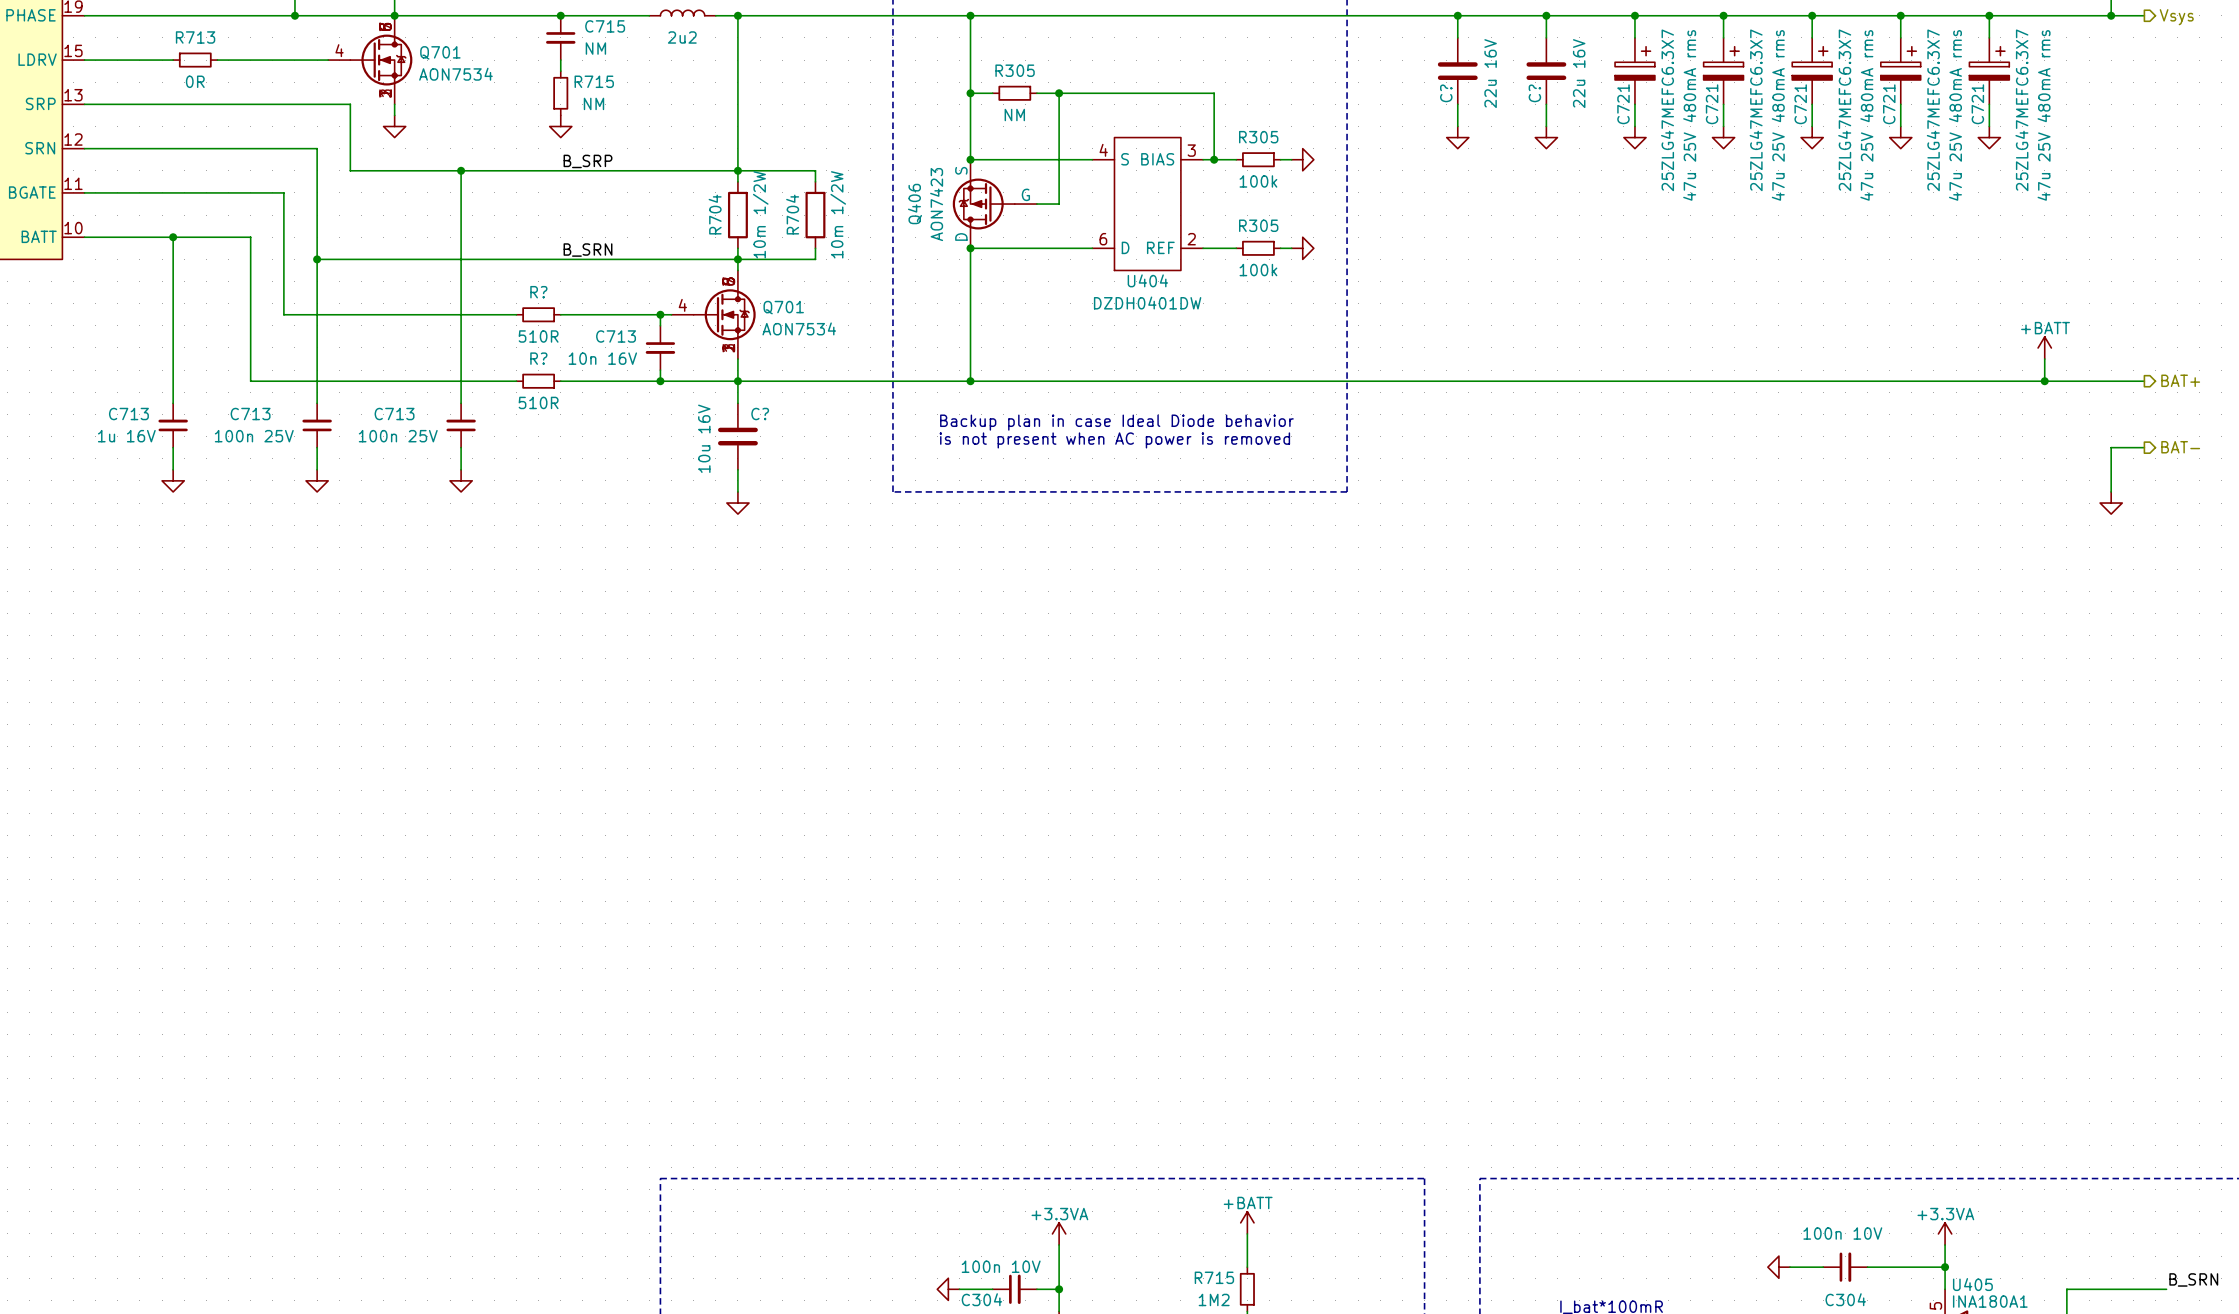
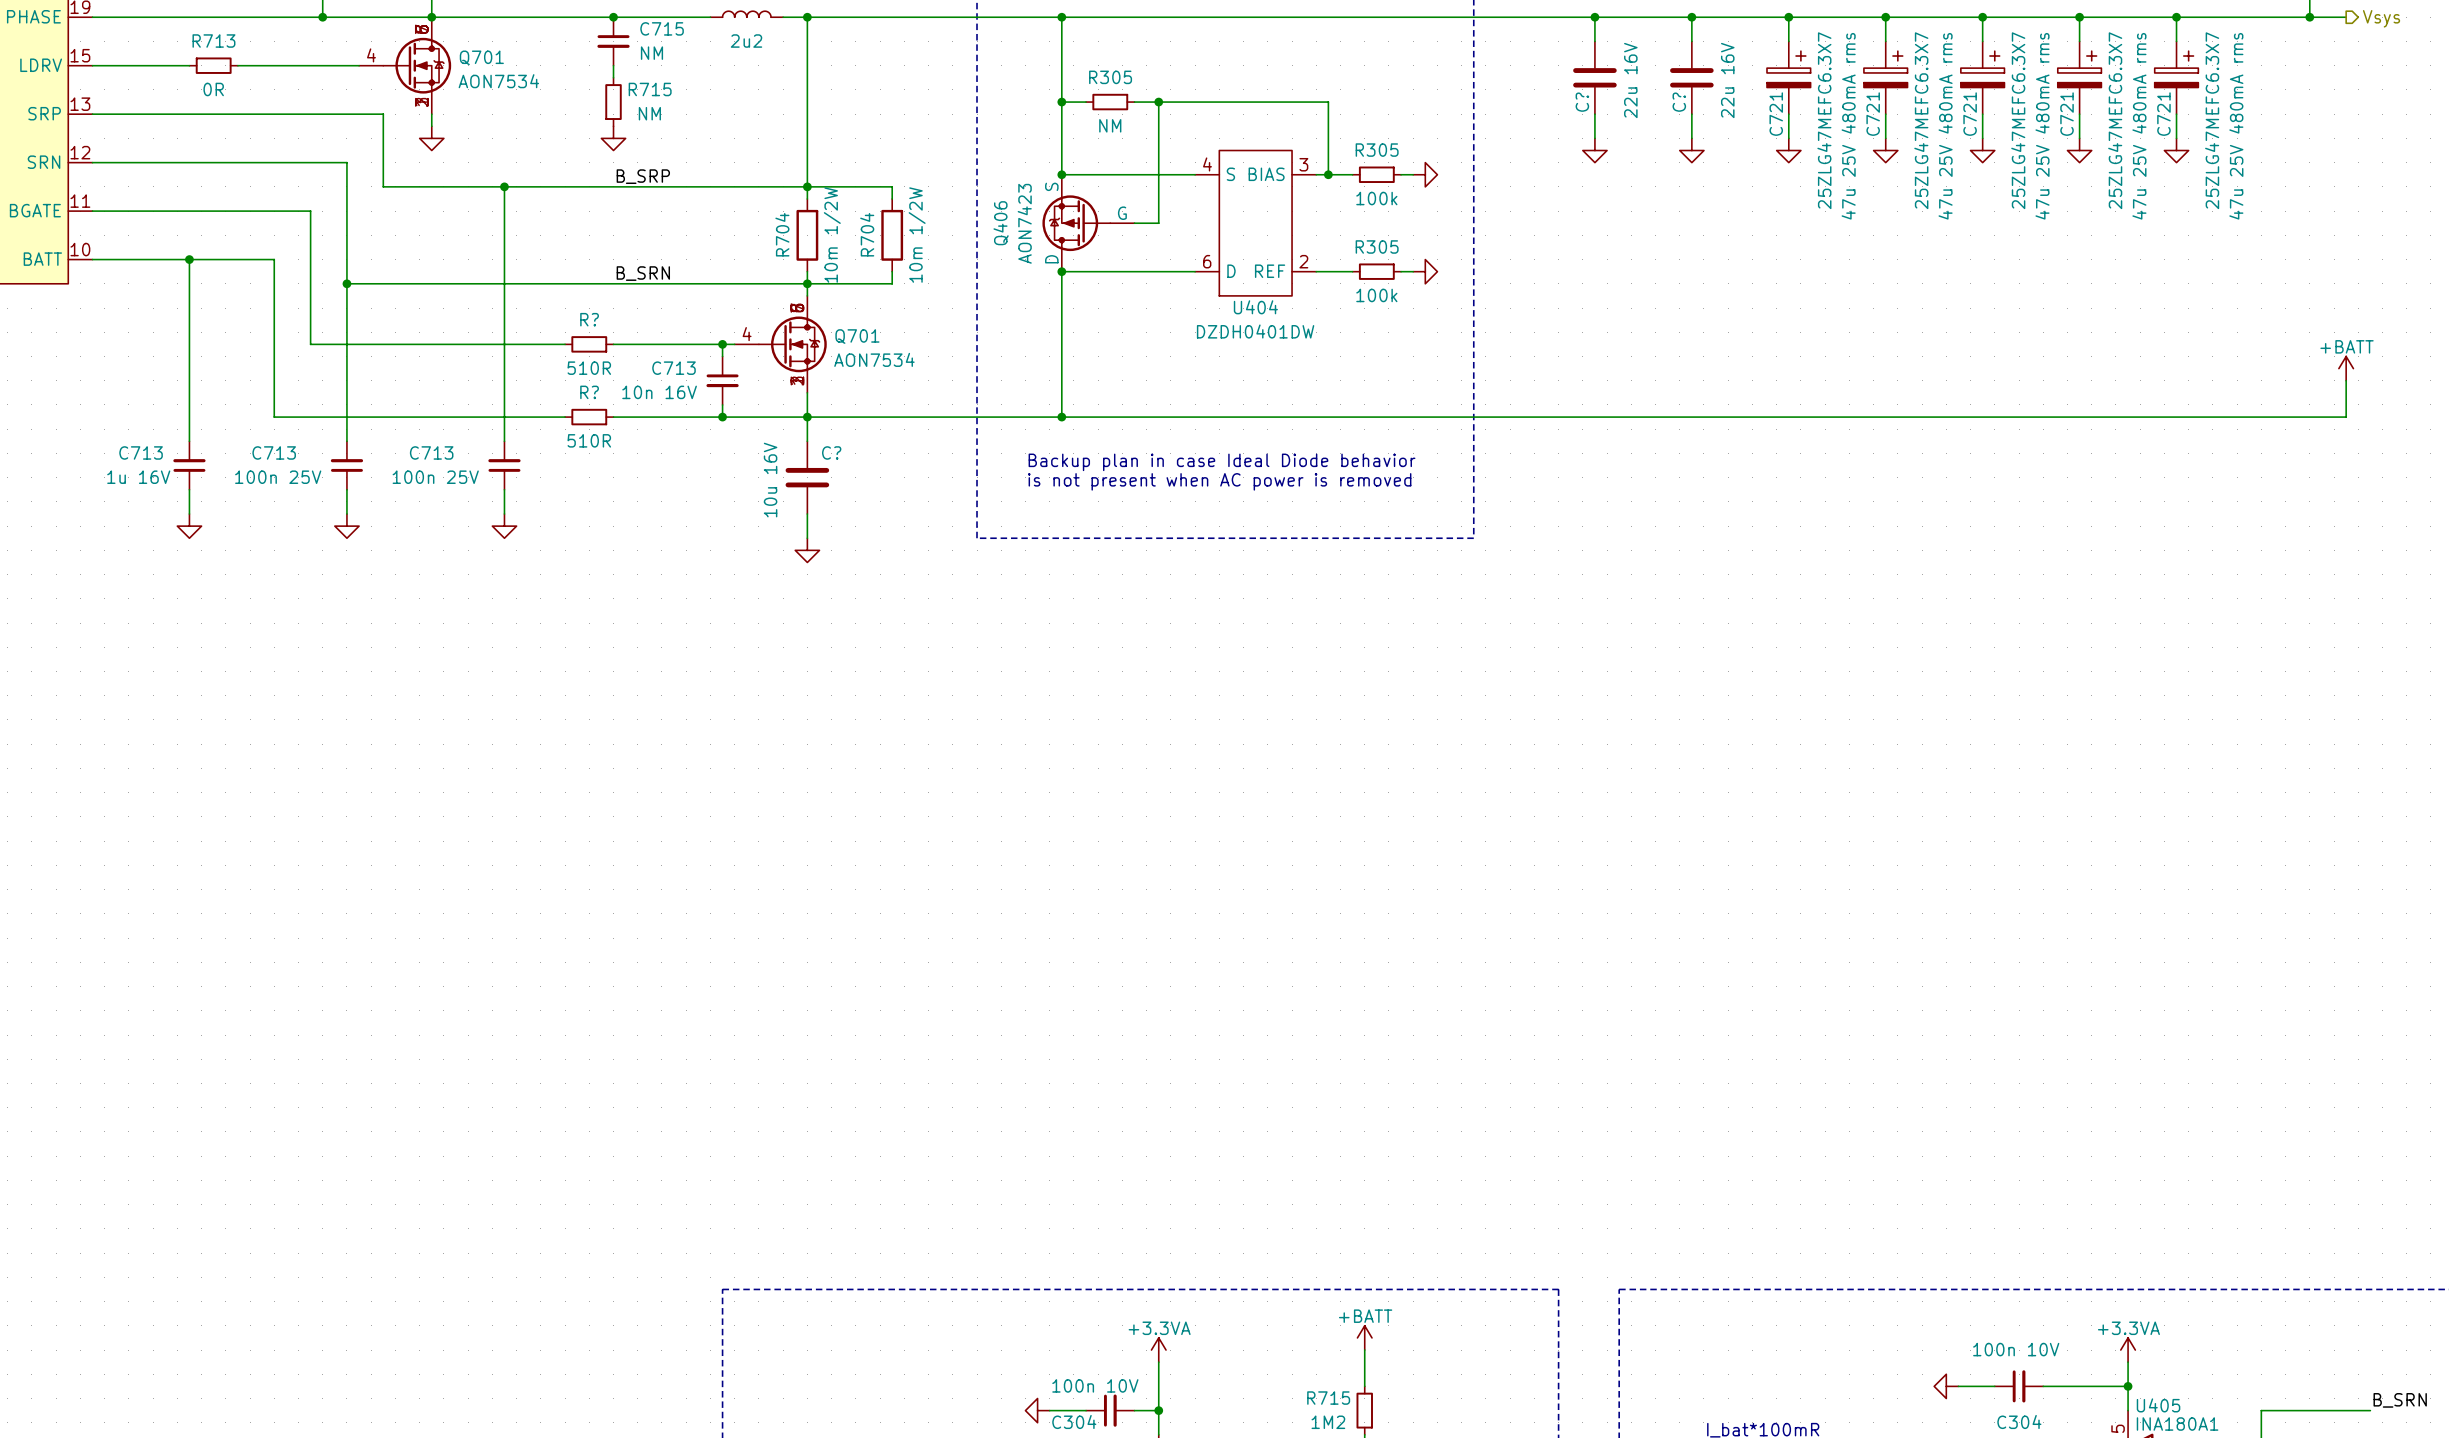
power symbol position: +BATT (2044, 347) -> +BATT (2346, 368)
wire: none -> (2346, 380) (2346, 417)
wire: (2044, 359) (2044, 381) -> none
hierarchical label: BAT+ (2180, 380) -> none
junction: (2044, 381) -> none
wire: (2144, 447) (2111, 447) (2111, 491) -> none
hierarchical label: BAT- (2180, 447) -> none
power symbol: (2111, 503) -> none

